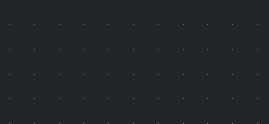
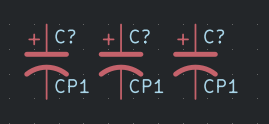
C?: none -> CP1 (46, 61)
C?: none -> CP1 (121, 61)
C?: none -> CP1 (195, 61)

